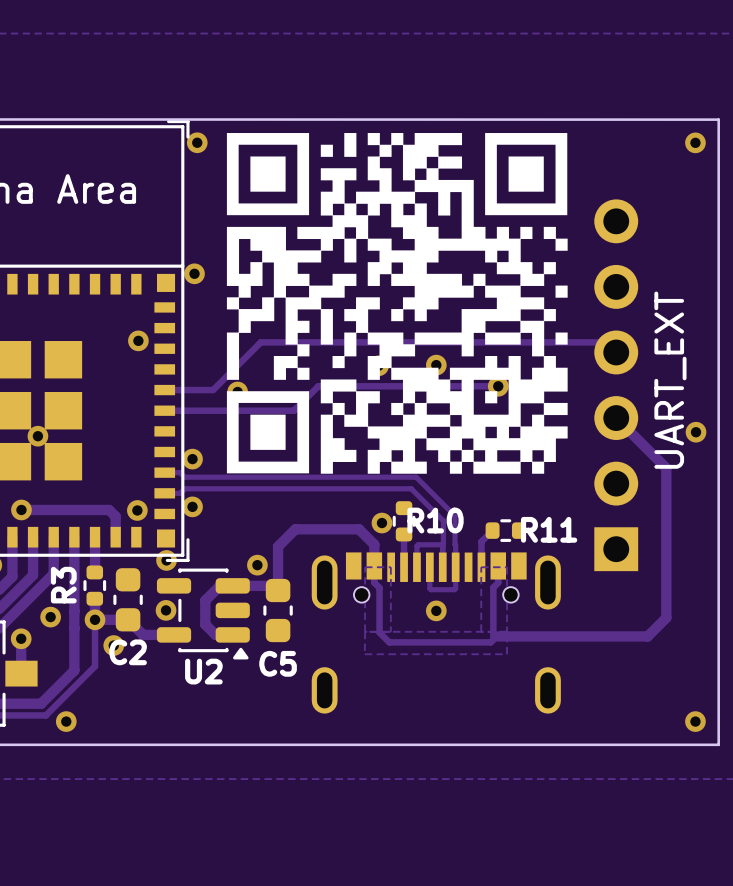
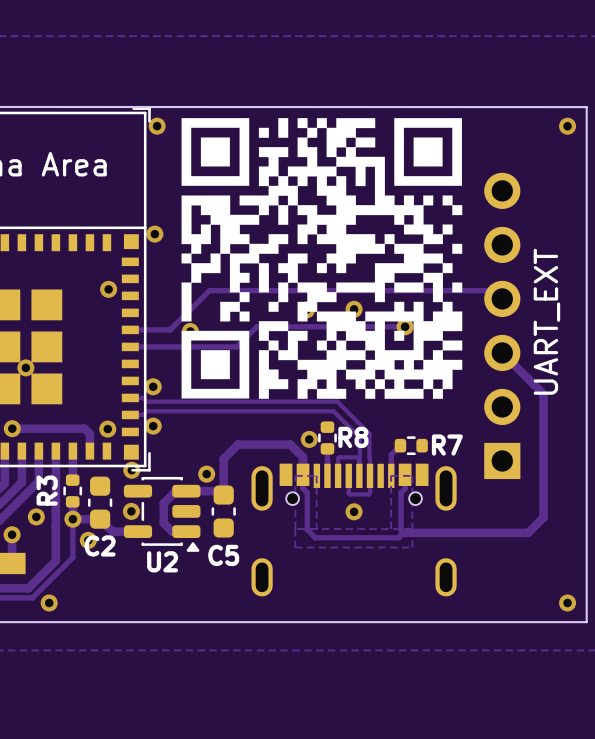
via: (696, 432) -> none
R10 name: R10 (435, 520) -> R8 (353, 437)
R11 name: R11 (549, 529) -> R7 (447, 445)

